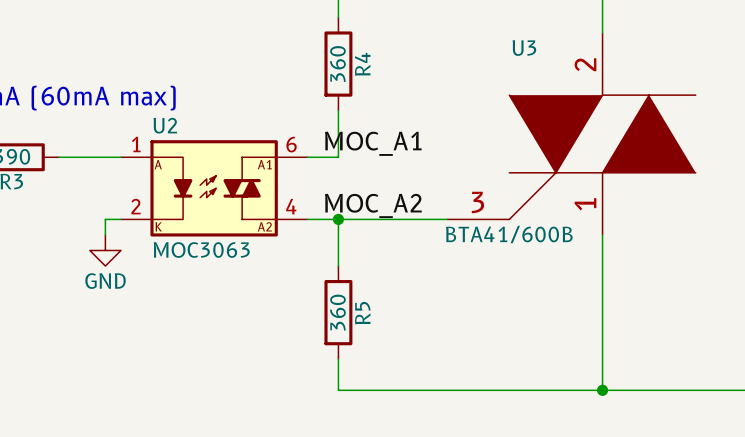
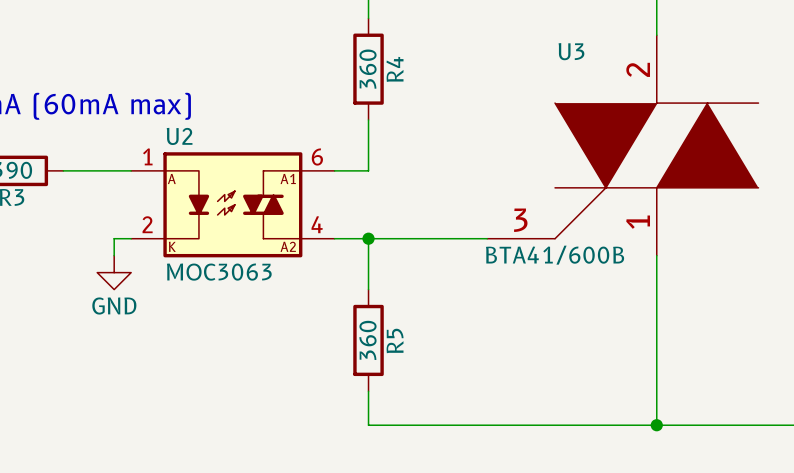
label: MOC_A1 (373, 143) -> none
label: MOC_A2 (373, 205) -> none

